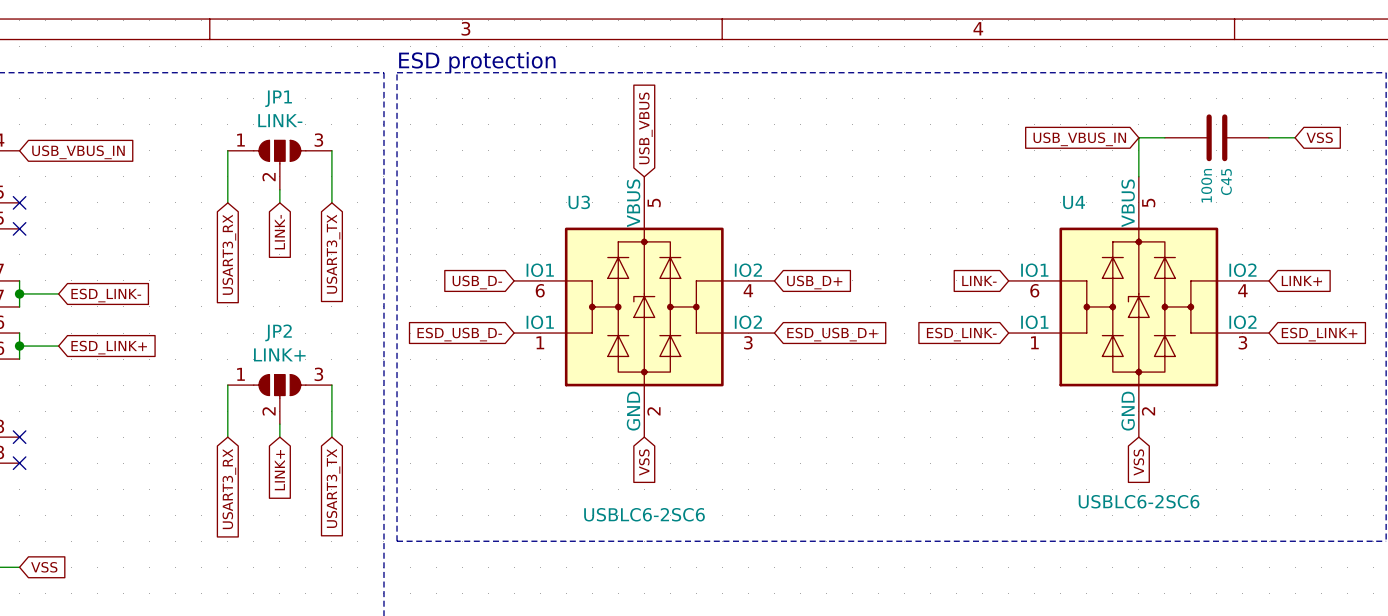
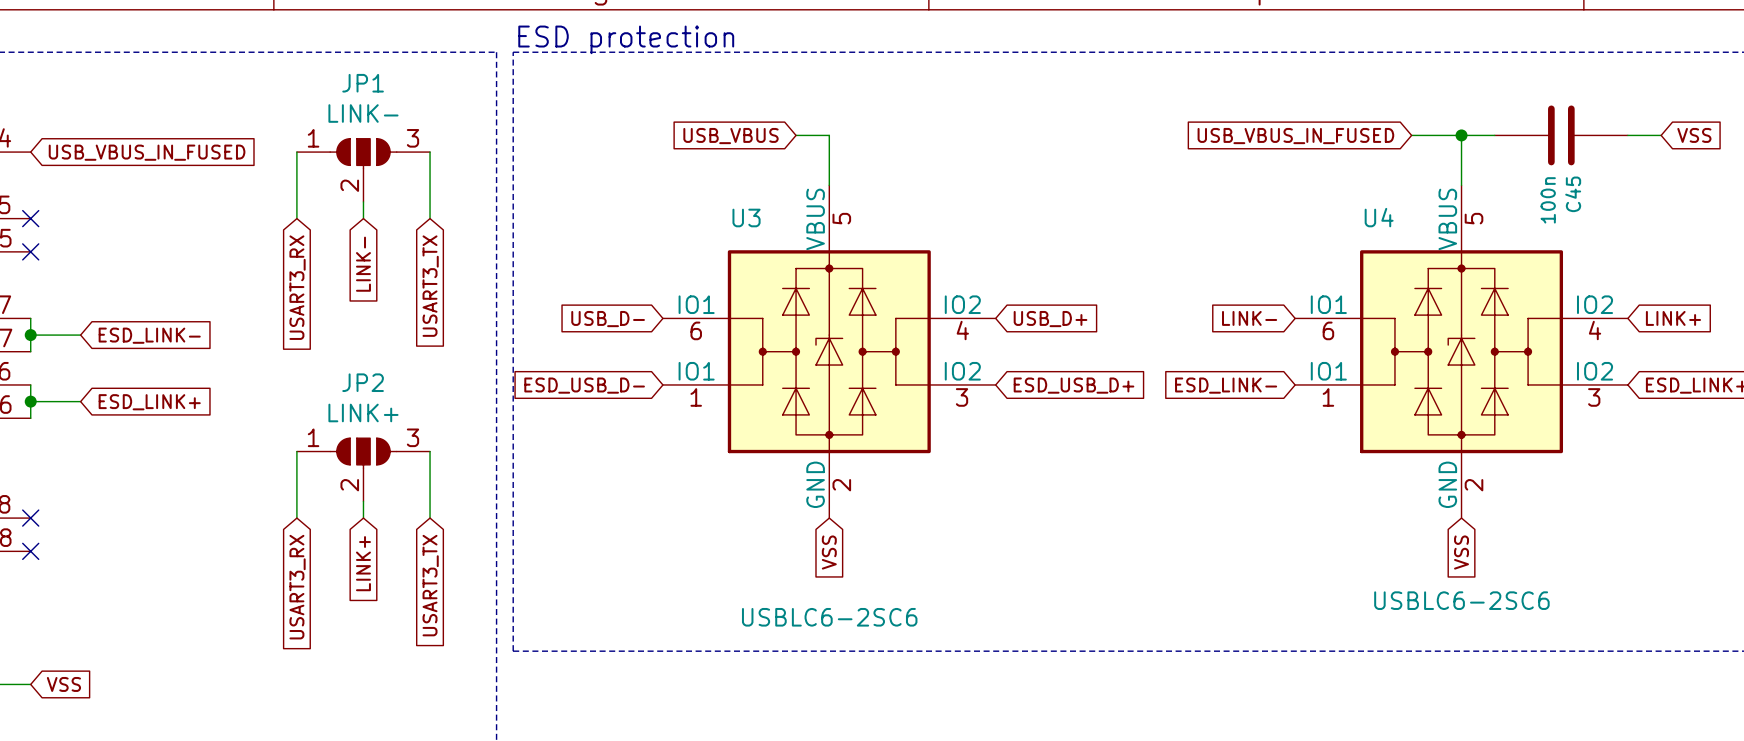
global label rotation: 0° (645, 128) -> 90° counterclockwise (730, 136)
wire: none -> (796, 135) (829, 135) (829, 185)
wire: none -> (1411, 135) (1461, 135)
junction: none -> (1461, 135)
global label: USB_VBUS_IN (1079, 139) -> USB_VBUS_IN_FUSED (1295, 136)
global label: USB_VBUS_IN (78, 152) -> USB_VBUS_IN_FUSED (147, 152)

